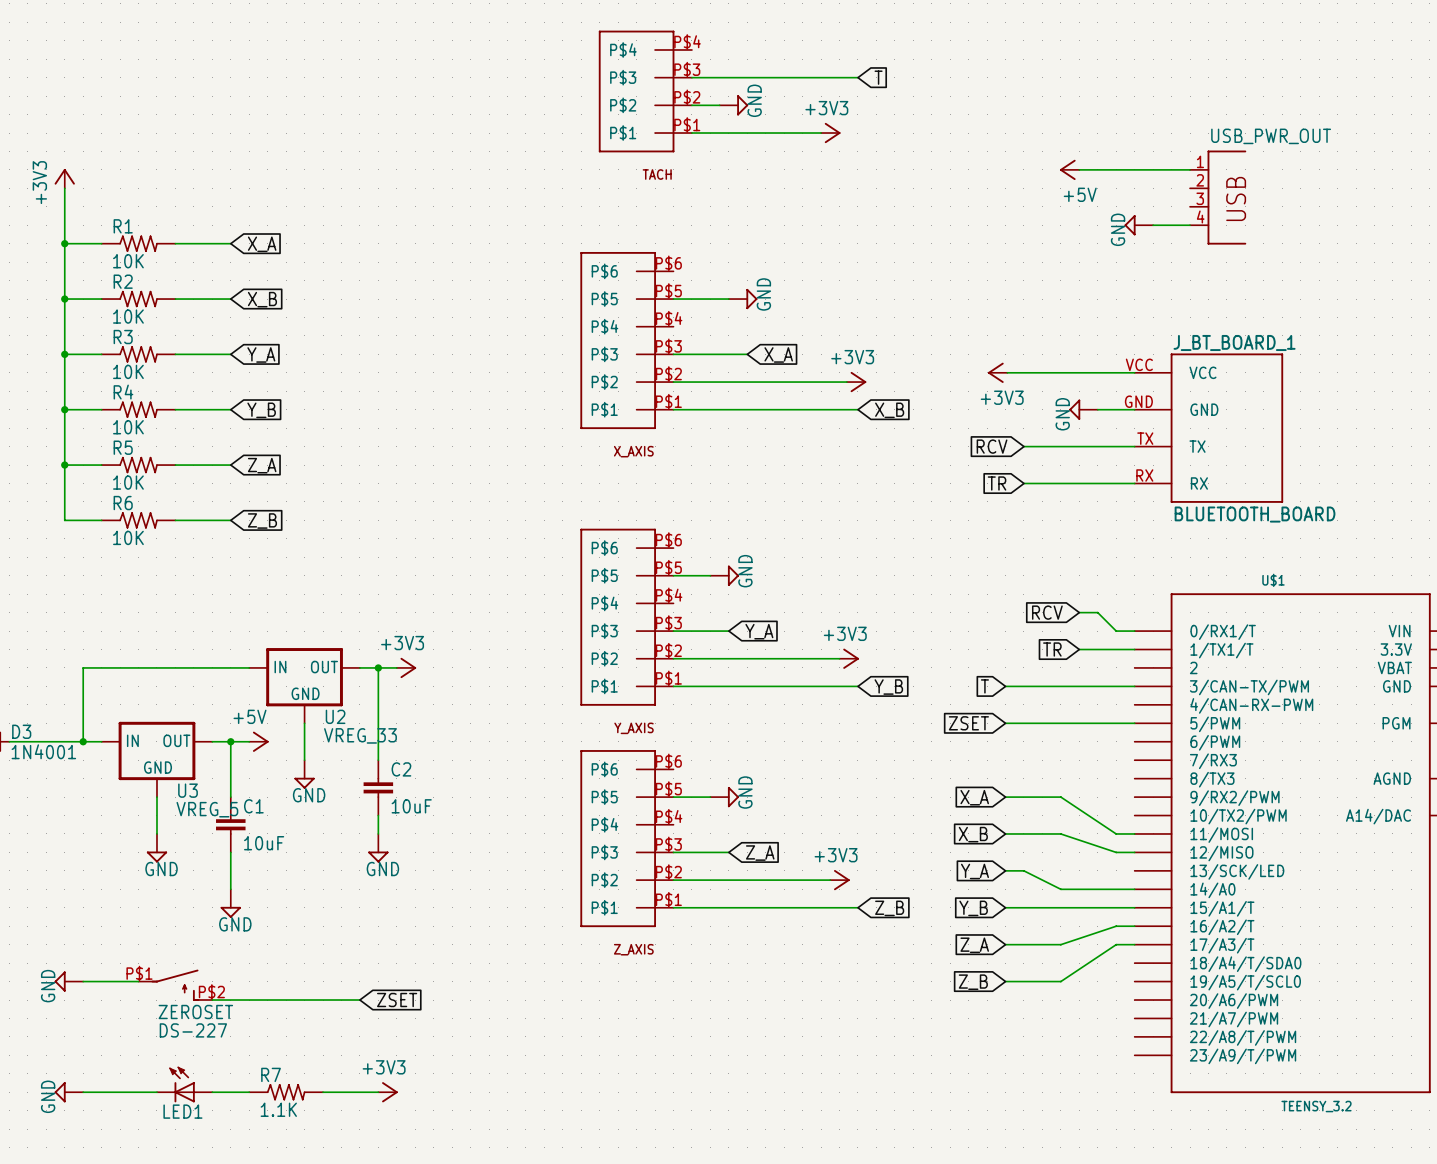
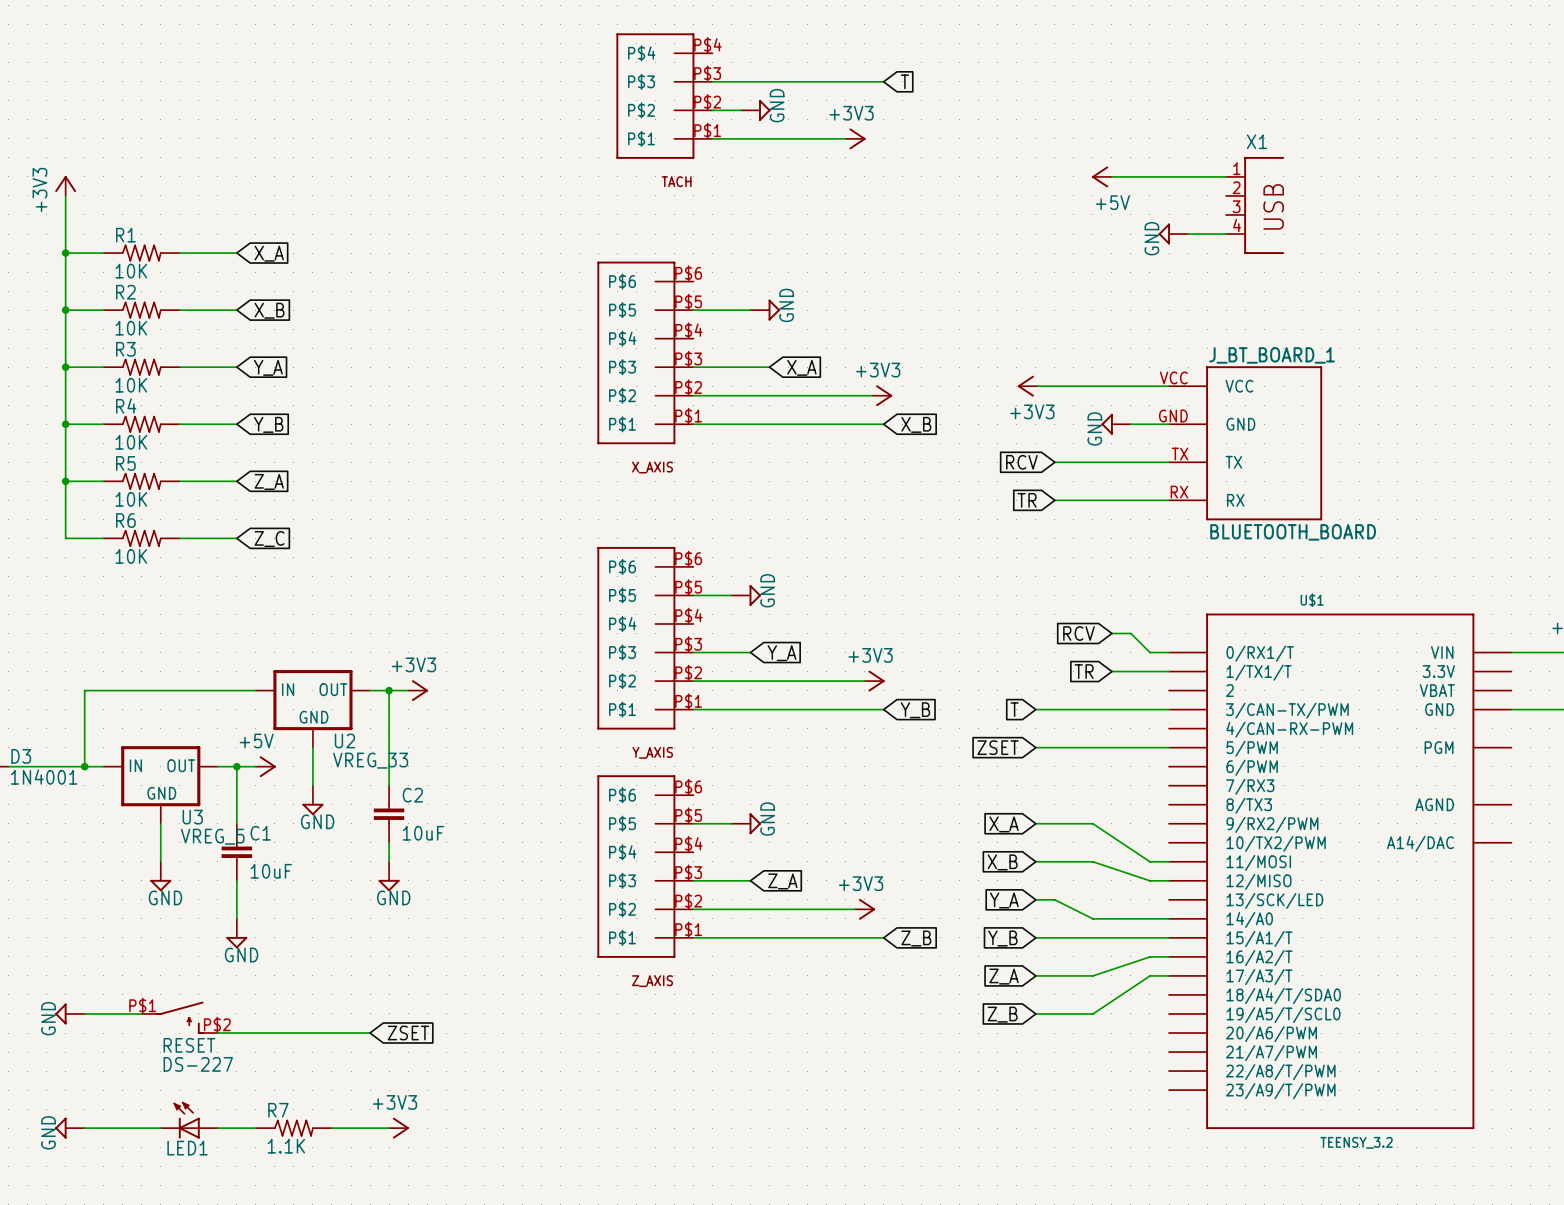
USB_PWR_OUT name: USB_PWR_OUT (1271, 136) -> X1 (1256, 141)
global label: Z_B (262, 521) -> Z_C (269, 539)
ZEROSET name: ZEROSET (195, 1011) -> RESET (189, 1045)

